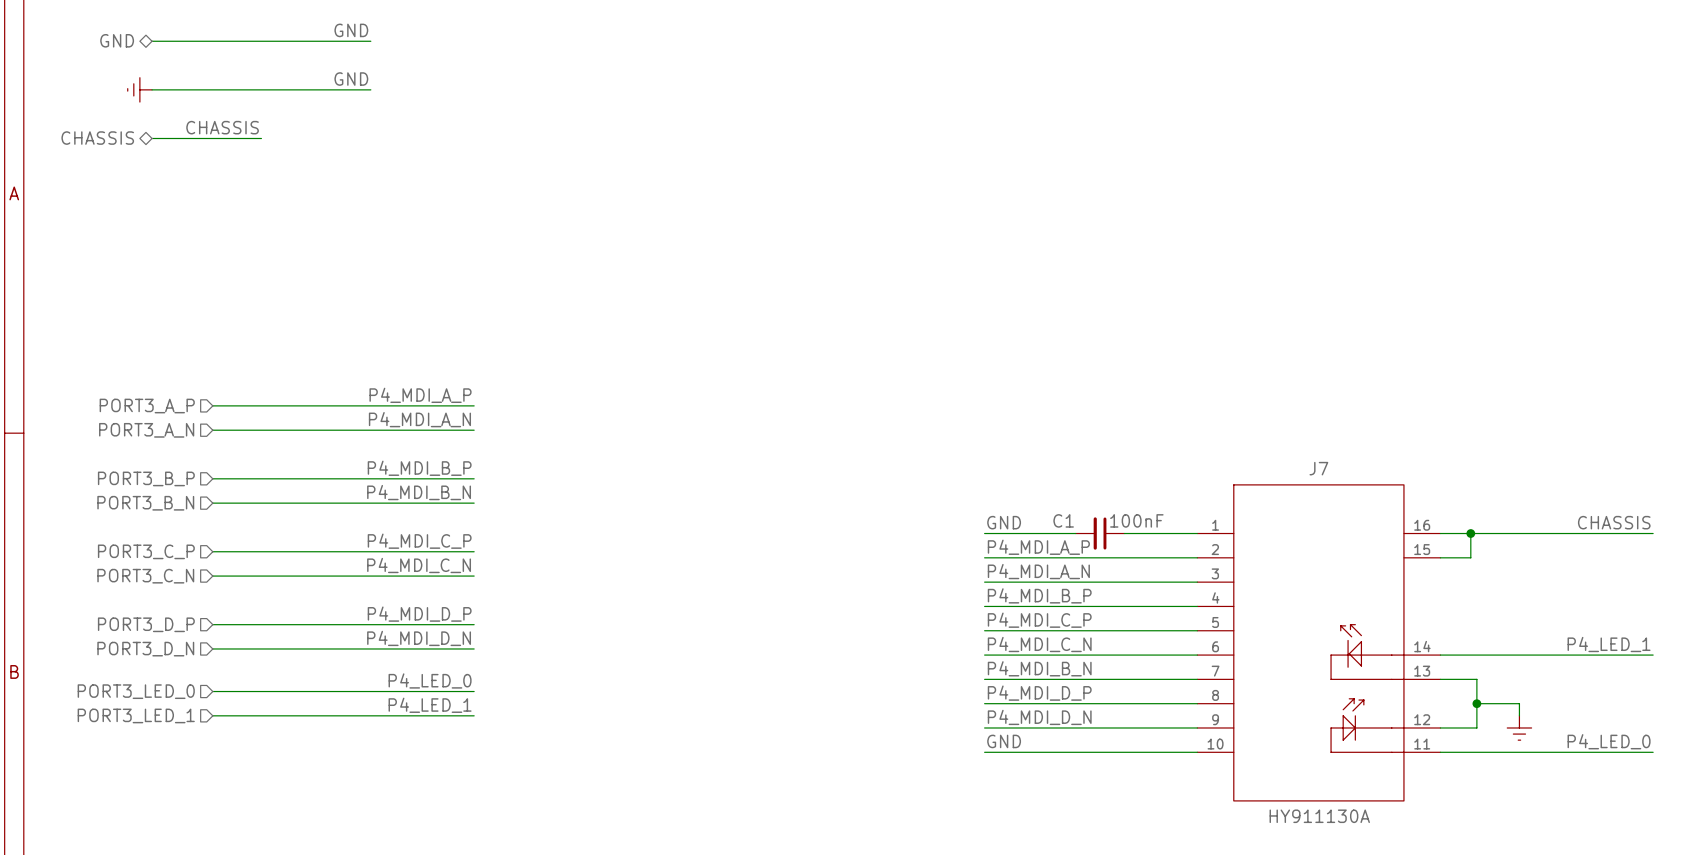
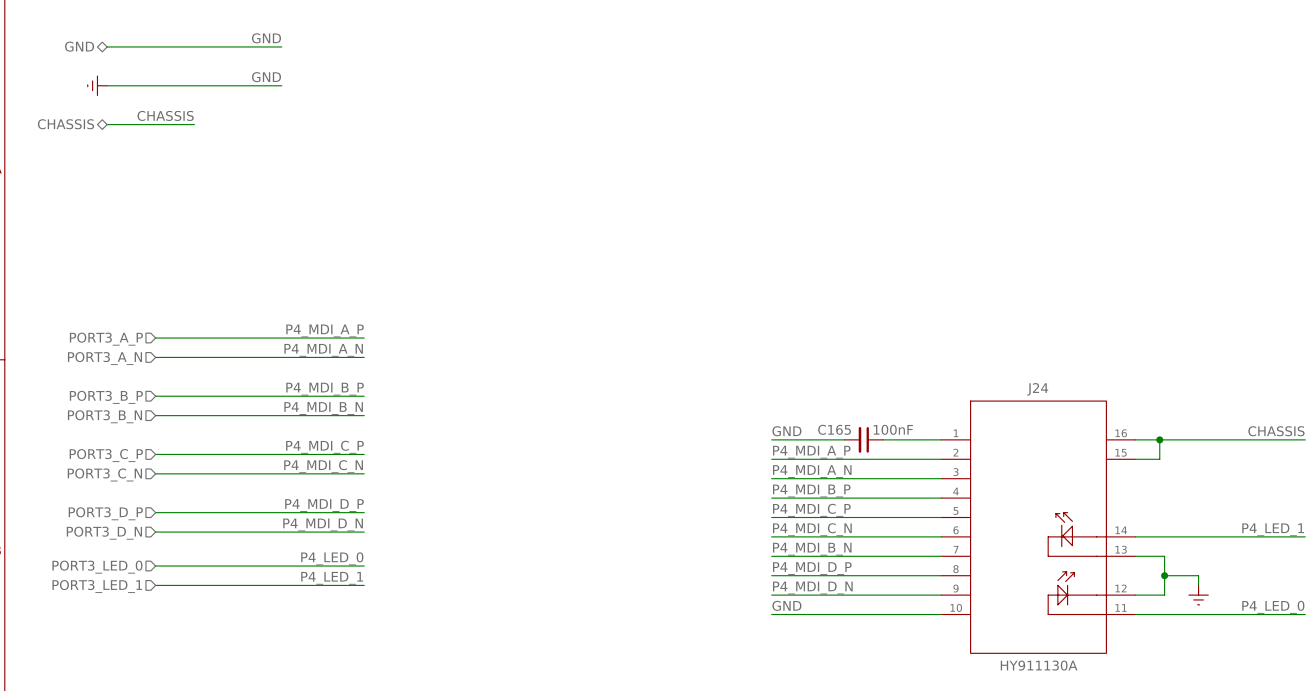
J7 name: J7 (1318, 468) -> J24 (1037, 389)
C1 name: C1 (1063, 520) -> C165 (834, 429)

